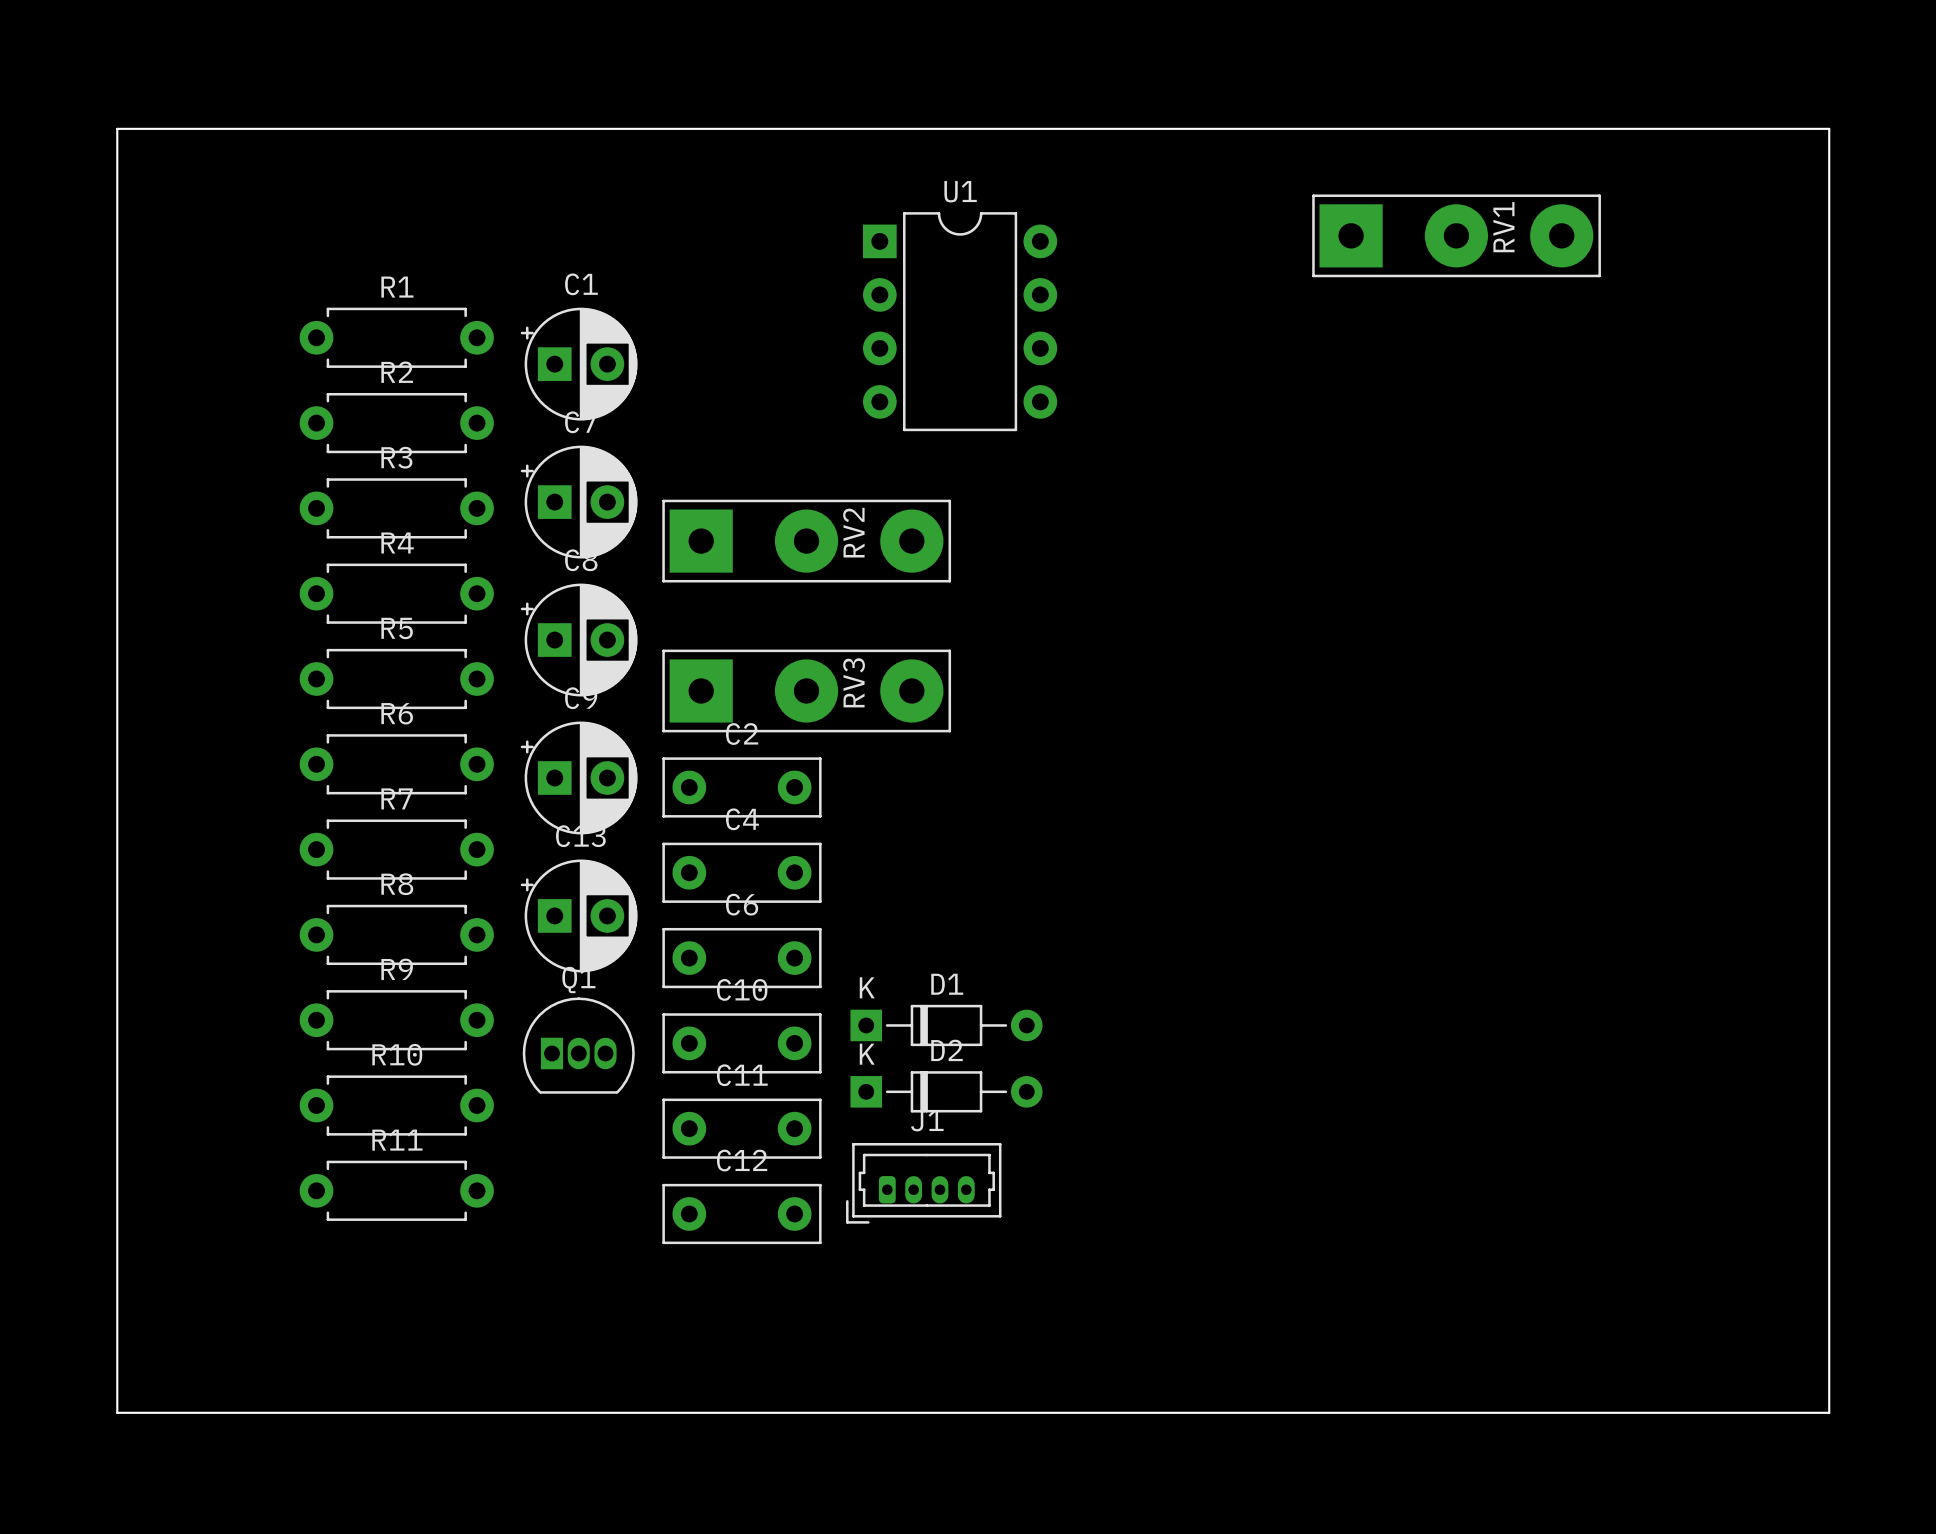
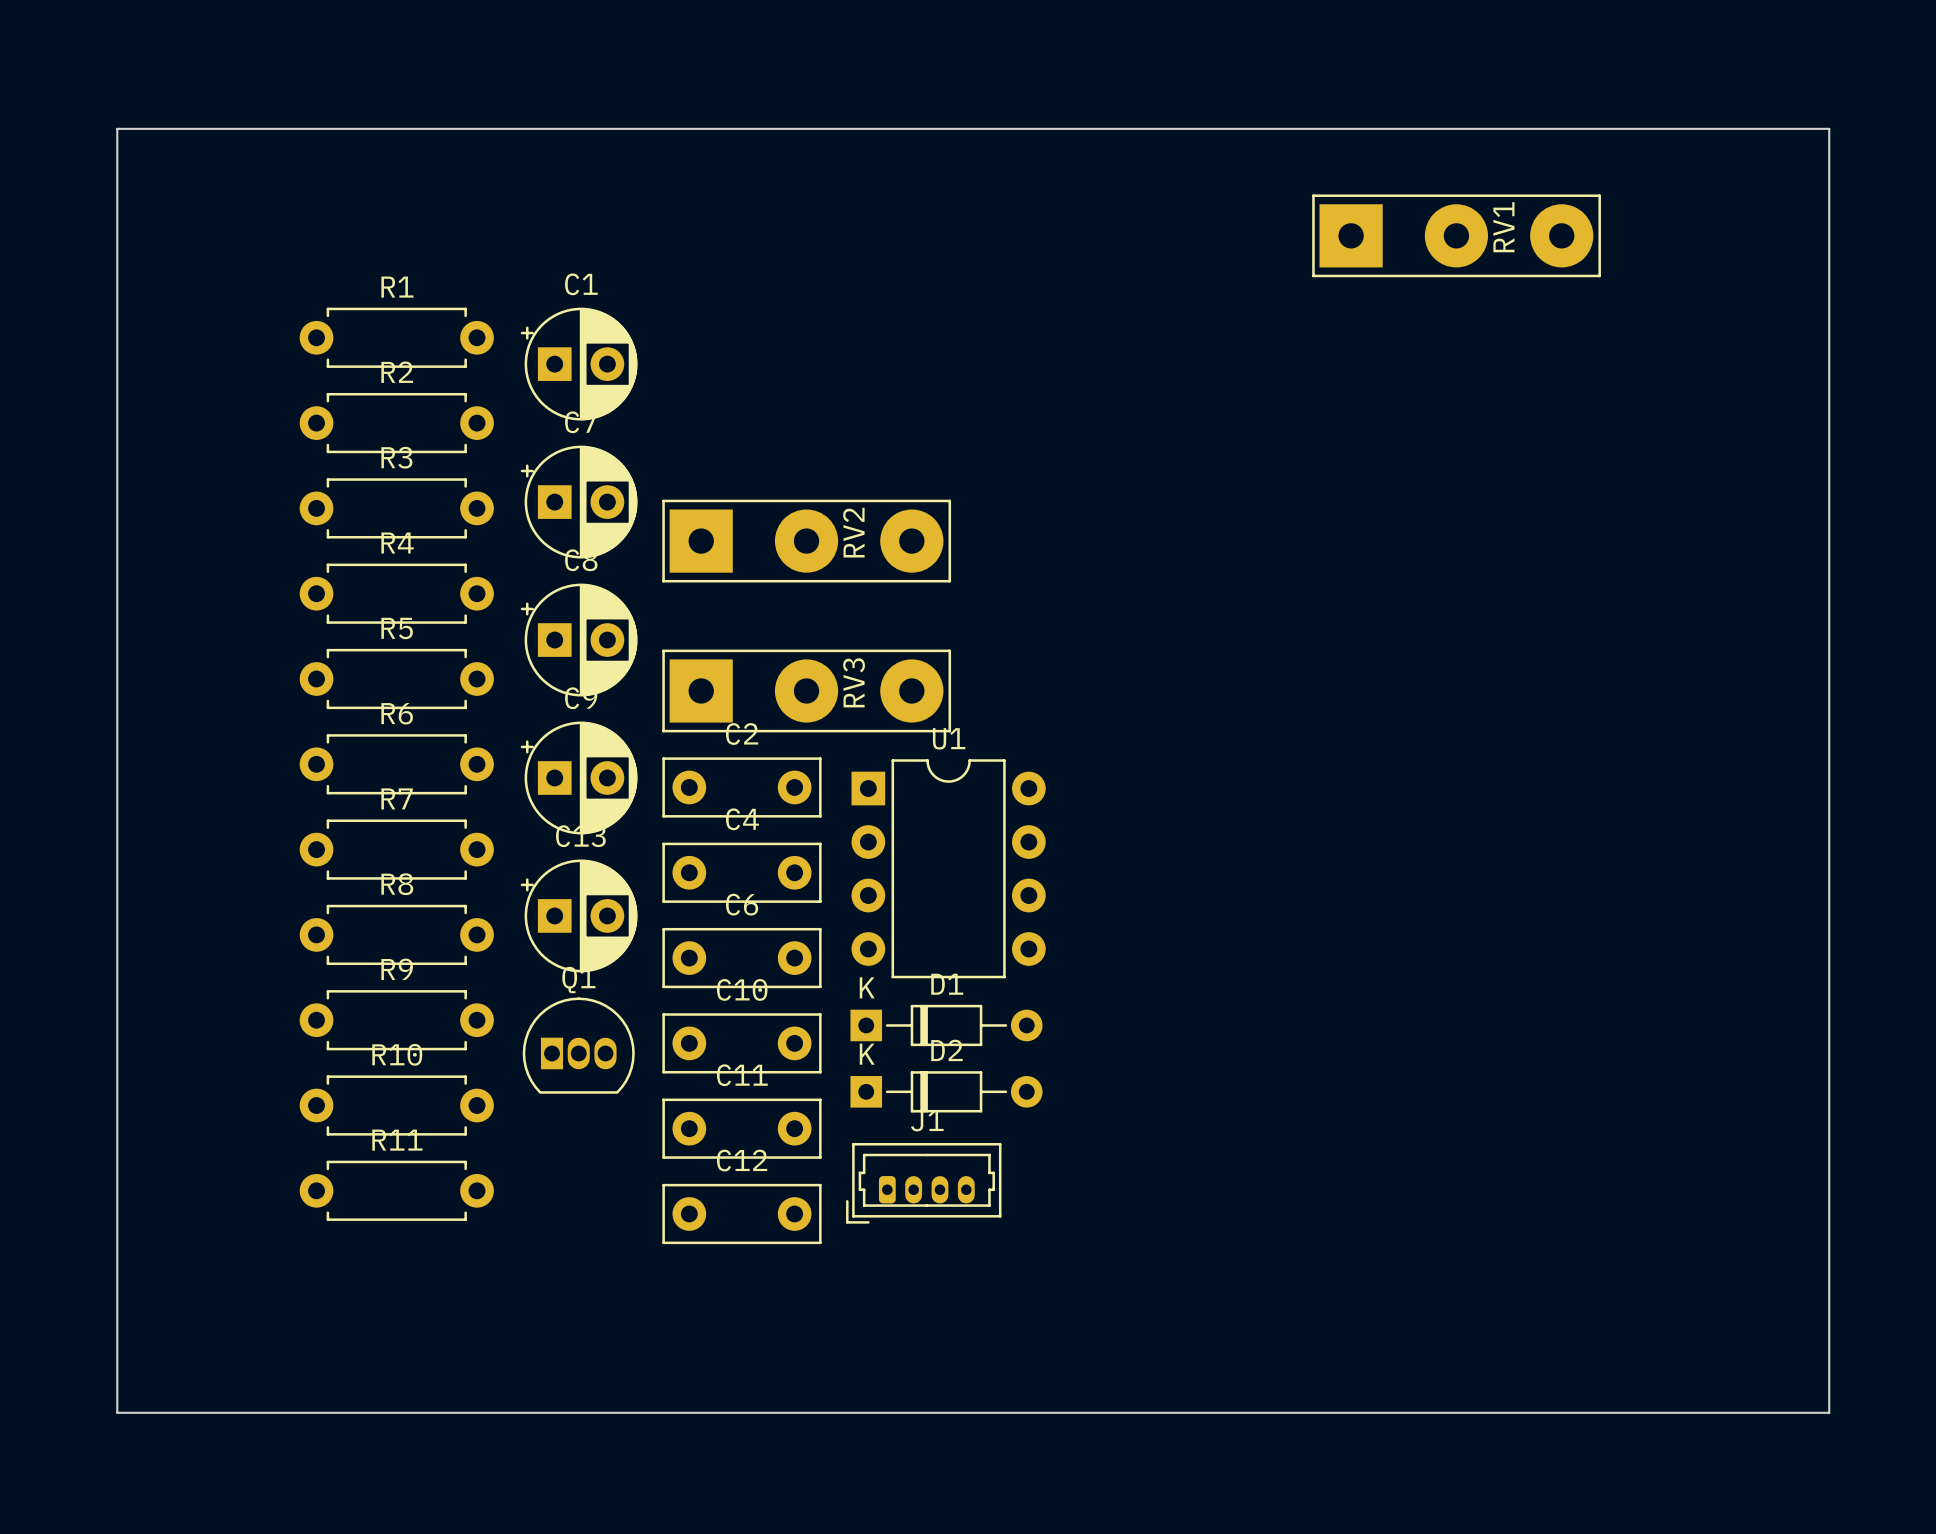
U1 position: (960, 321) -> (948, 868)

